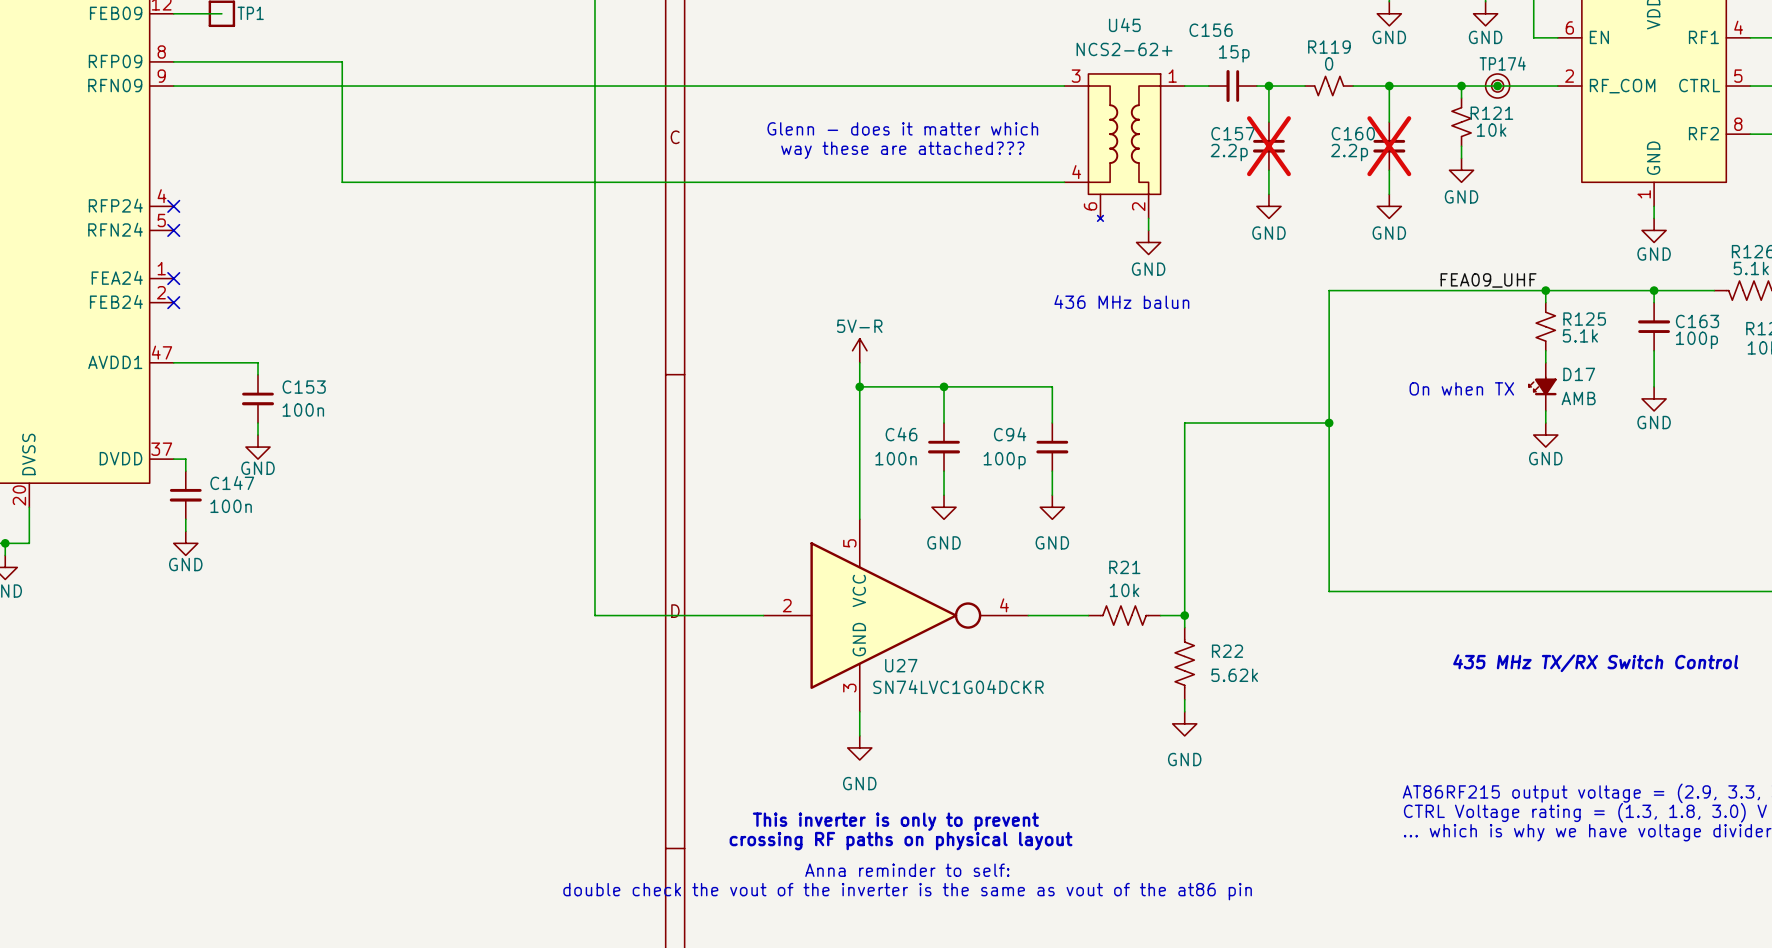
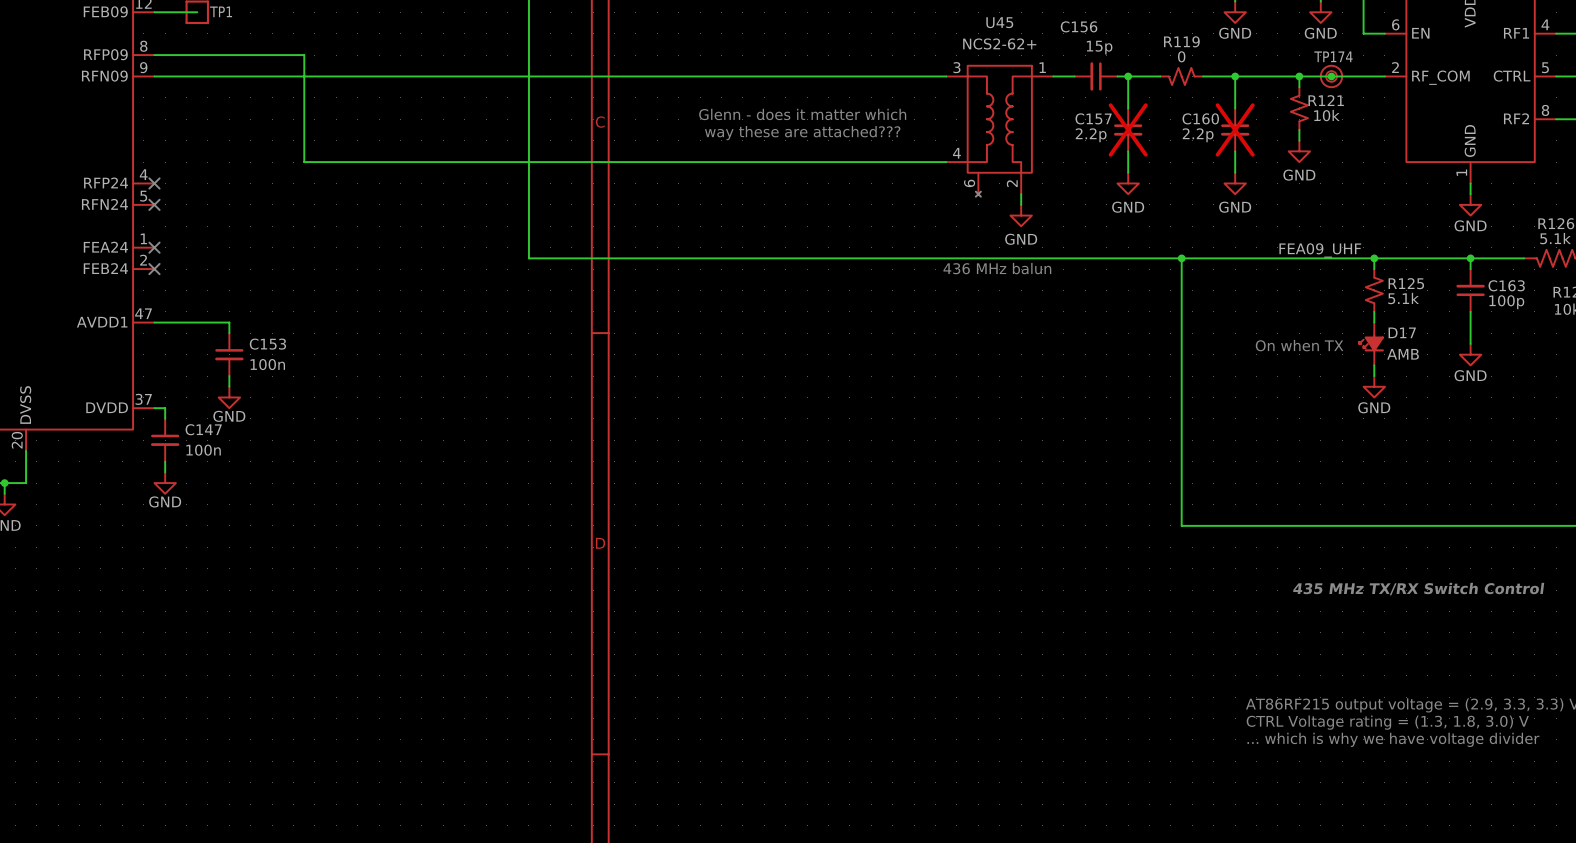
wire: (594, 290) (594, 615) (763, 615) -> (528, 258) (1181, 258)
junction: none -> (1181, 258)
power symbol: 5V-R (859, 350) -> none
wire: (859, 362) (859, 519) -> none
wire: (859, 386) (1052, 386) (1052, 422) -> none
junction: (859, 386) -> none
wire: (944, 386) (944, 422) -> none
junction: (944, 386) -> none
wire: (1329, 422) (1184, 422) (1184, 627) -> none
junction: (1329, 422) -> none
C46: 100n (944, 447) -> none
C94: 100p (1052, 447) -> none
wire: (944, 471) (944, 495) -> none
wire: (1052, 471) (1052, 495) -> none
power symbol: GND (944, 507) -> none
power symbol: GND (1052, 507) -> none
U27: SN74LVC1G04DCKR (895, 615) -> none
wire: (1028, 615) (1088, 615) -> none
R21: 10k (1124, 615) -> none
wire: (1160, 615) (1184, 615) -> none
junction: (1184, 615) -> none
R22: 5.62k (1184, 663) -> none
wire: (1184, 699) (1184, 711) -> none
wire: (859, 711) (859, 735) -> none
power symbol: GND (1184, 723) -> none
power symbol: GND (859, 747) -> none
text: This inverter is only to prevent (895, 821) -> none
text: crossing RF paths on physical layout (901, 841) -> none
text: Anna reminder to self: (907, 870) -> none
text: double check the vout of the inverter is the same as vout of the at86 pin (907, 891) -> none

